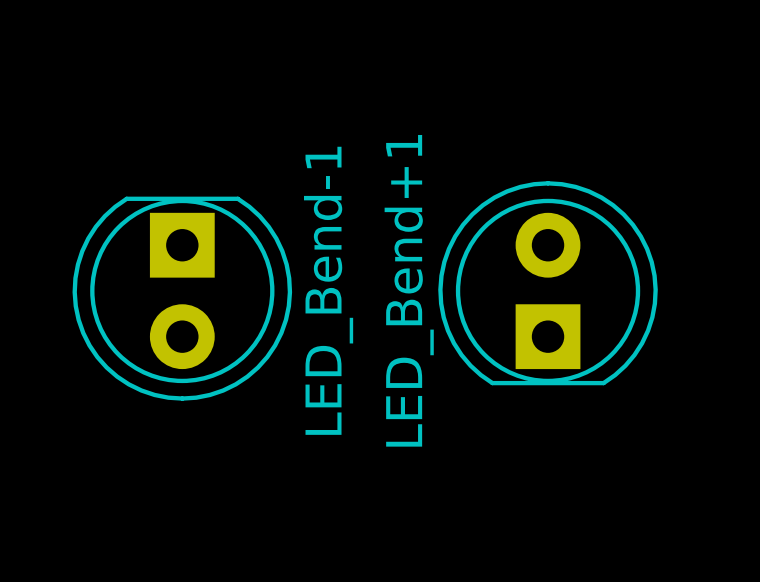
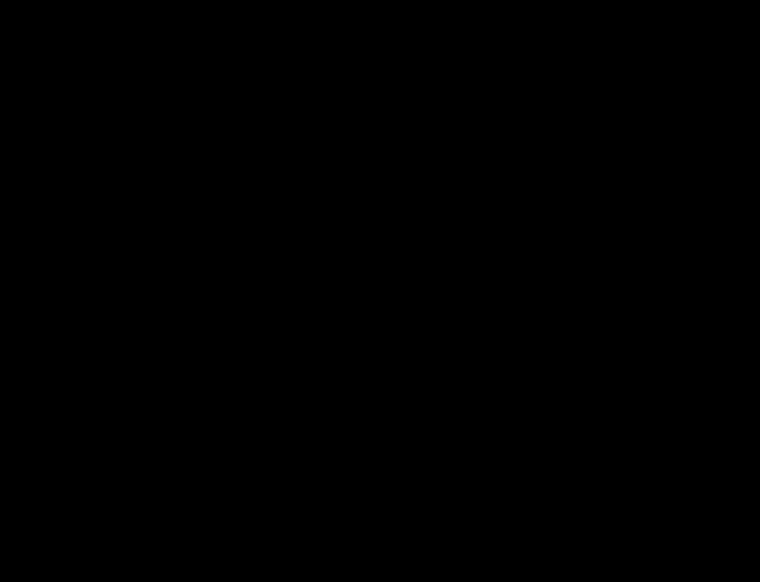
LED_Bend+1: (548, 283) -> none
LED_Bend-1: (182, 298) -> none

